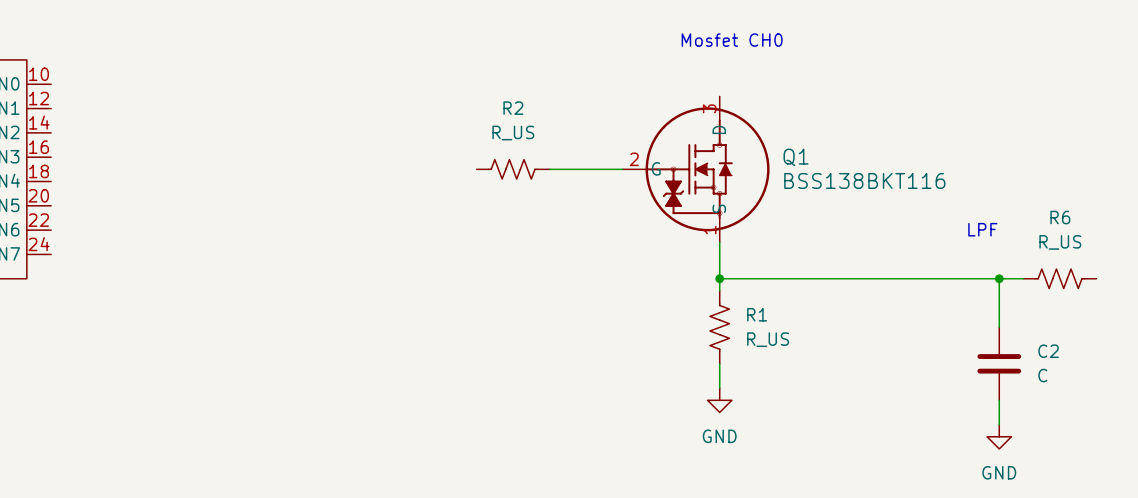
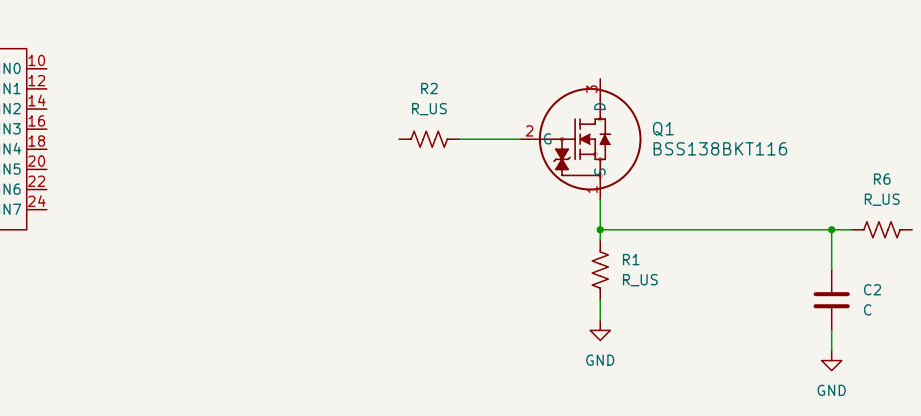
text: Mosfet CH0 (732, 40) -> none
text: LPF (982, 229) -> none

